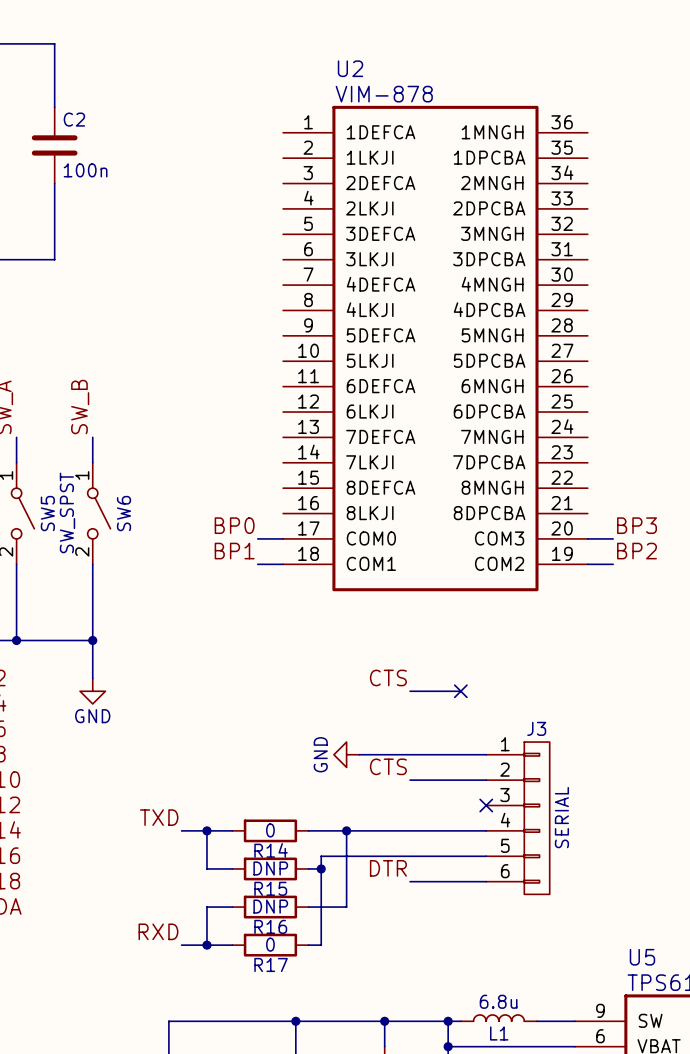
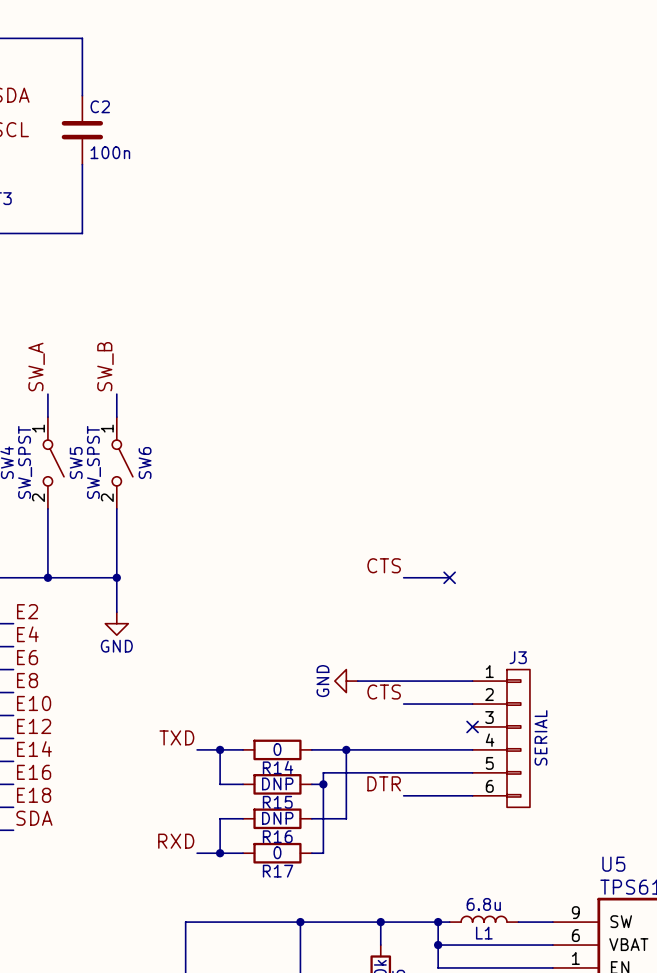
U2: VIM-878 (435, 348) -> none
label: BP0 (234, 525) -> none
label: BP3 (637, 525) -> none
wire: (257, 538) (283, 538) -> none
wire: (587, 538) (613, 538) -> none
label: BP1 (234, 551) -> none
label: BP2 (637, 551) -> none
wire: (257, 564) (283, 564) -> none
wire: (587, 564) (613, 564) -> none
label position: CTS (388, 677) -> CTS (384, 565)
wire: (410, 691) (460, 691) -> (403, 577) (449, 577)
no-connect mark position: (460, 691) -> (449, 577)

